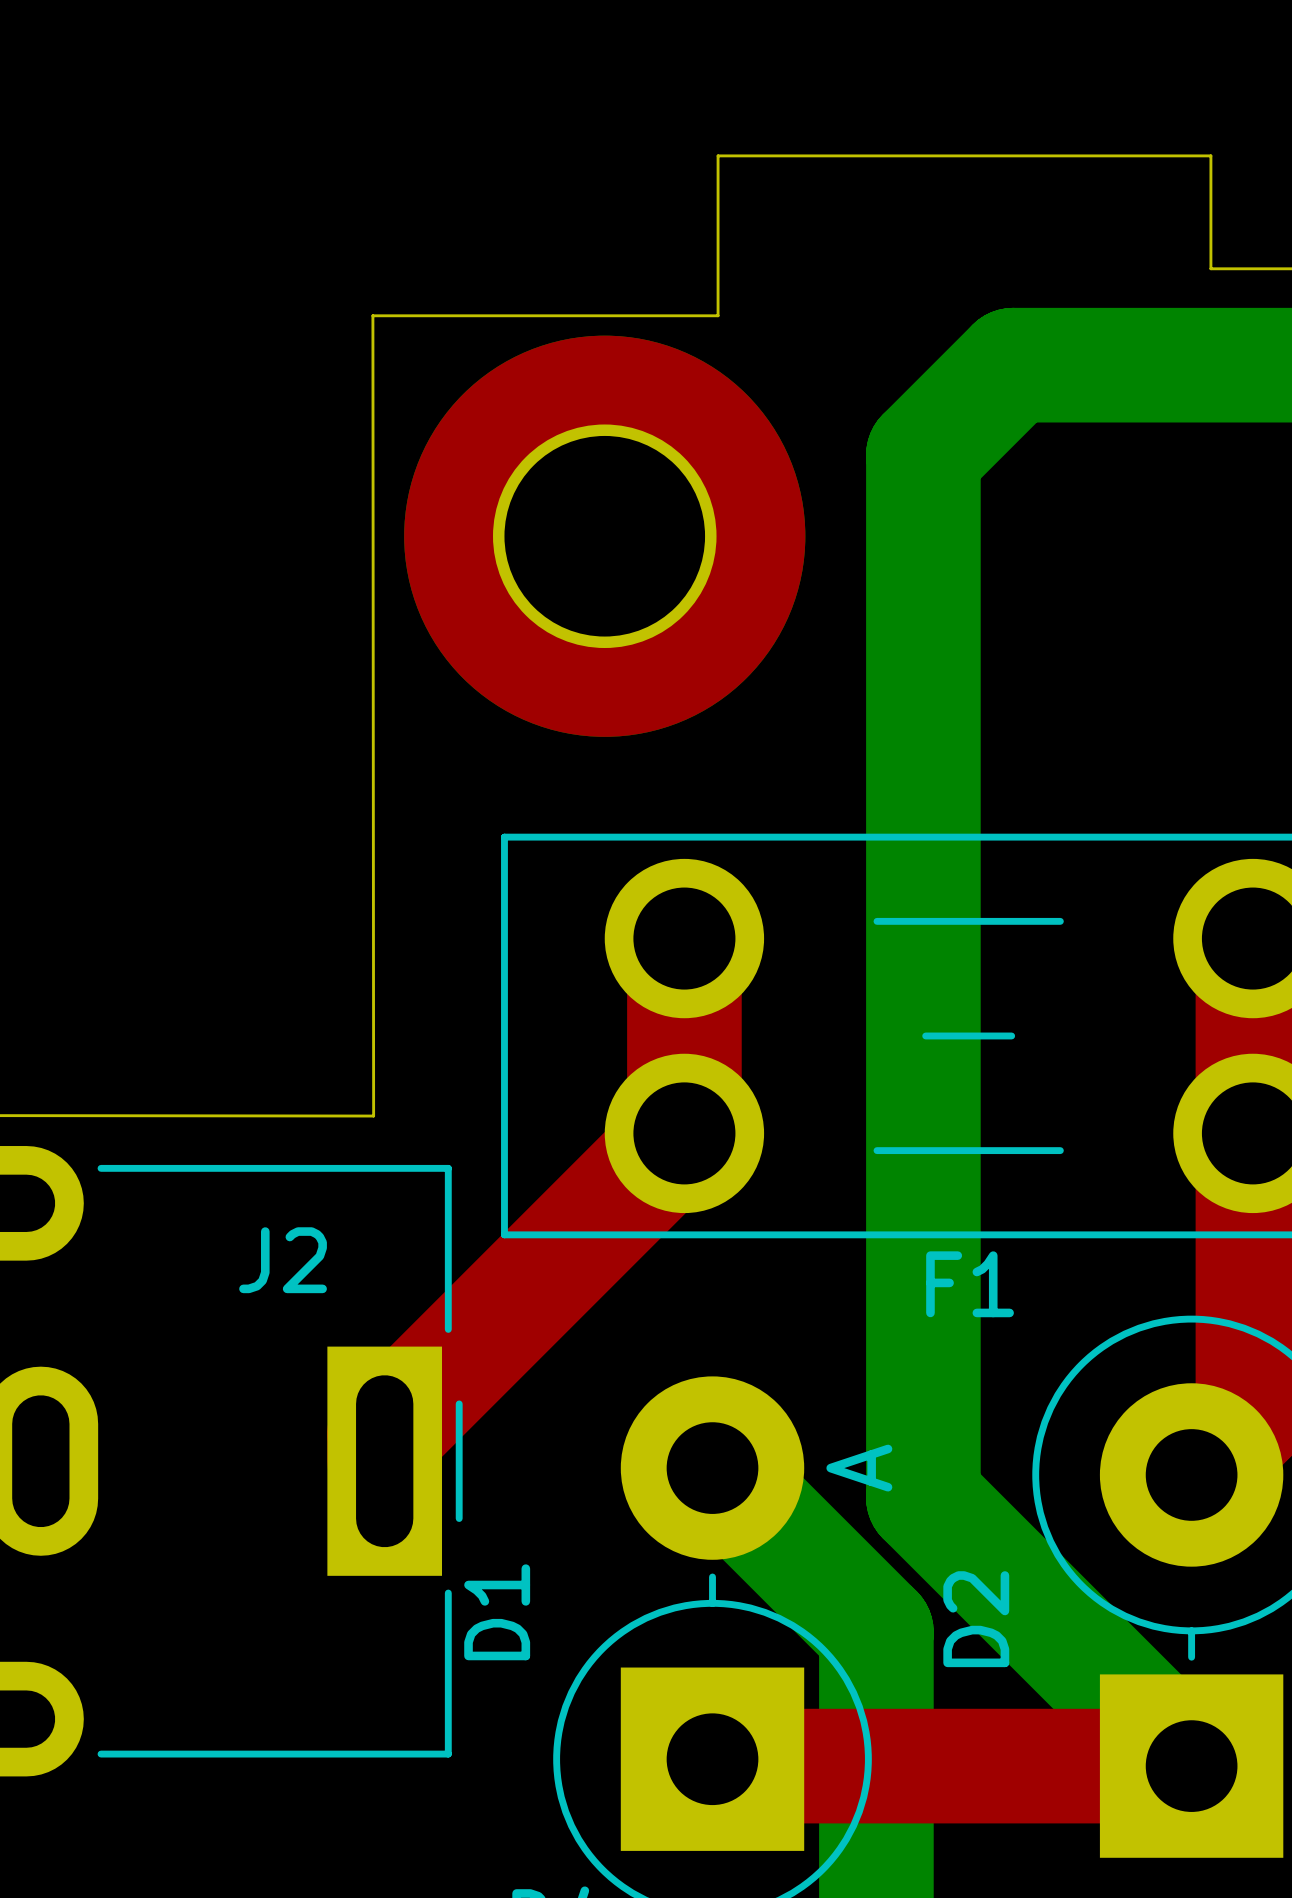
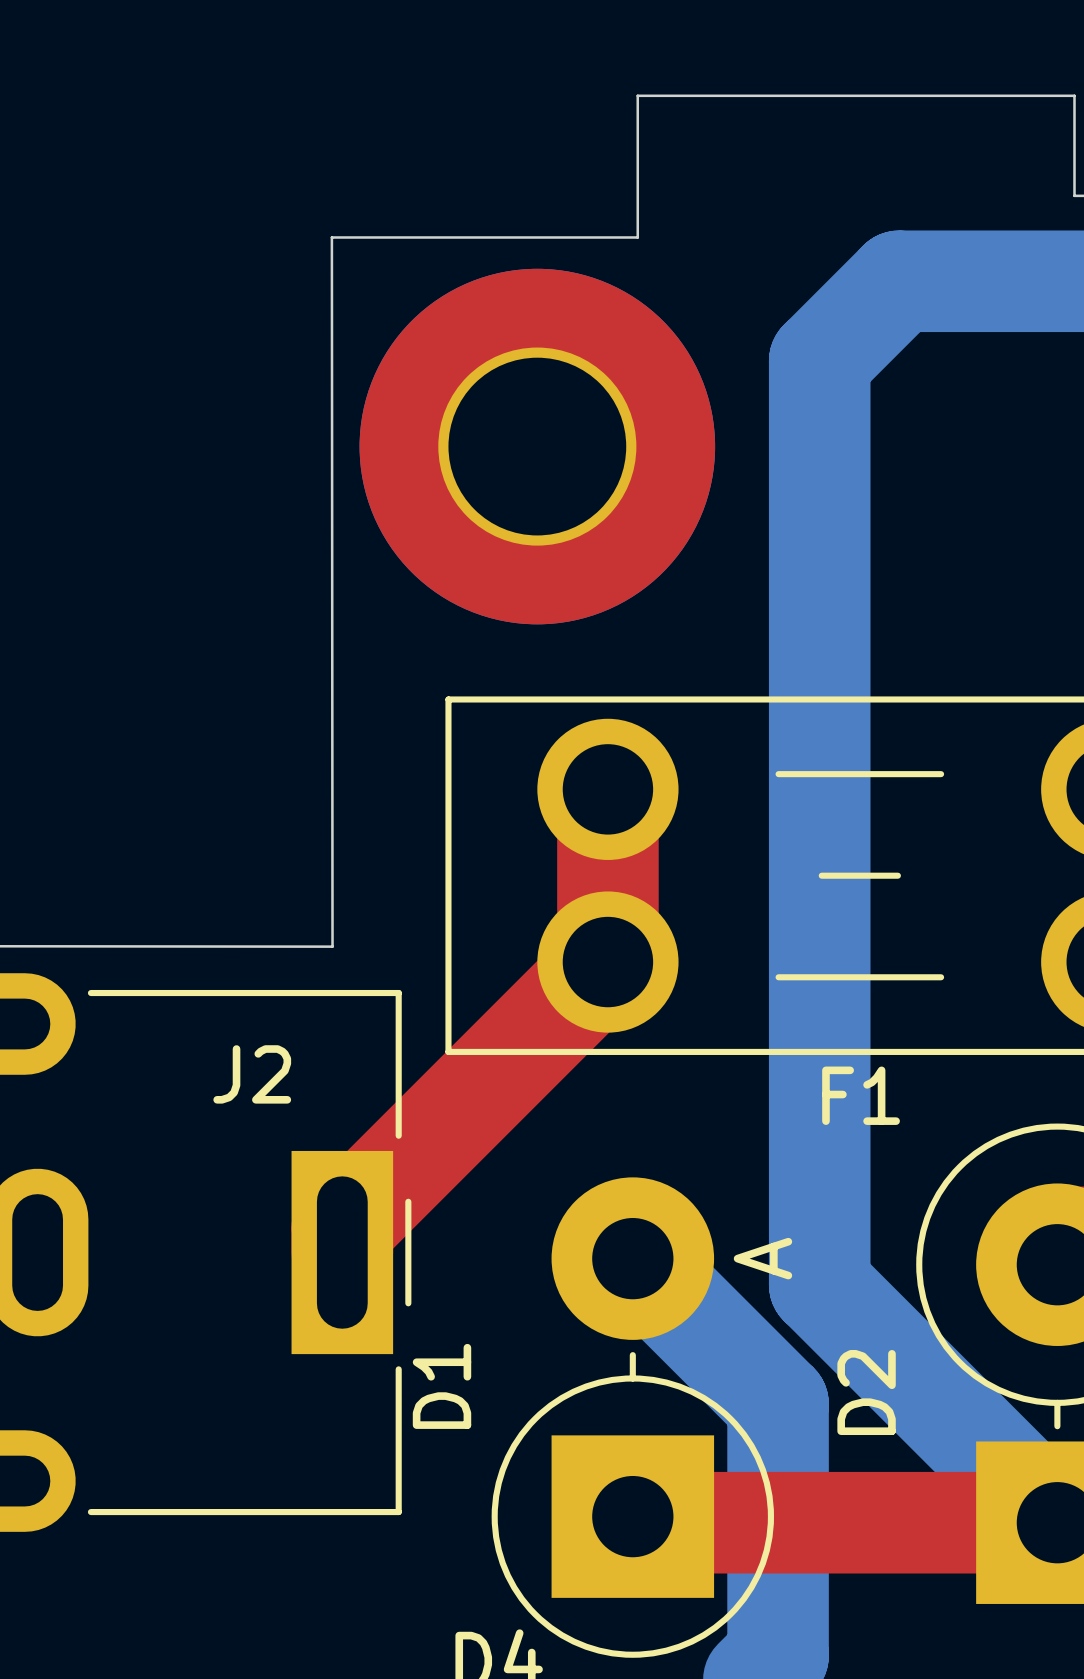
part position: (604, 536) -> (537, 446)

